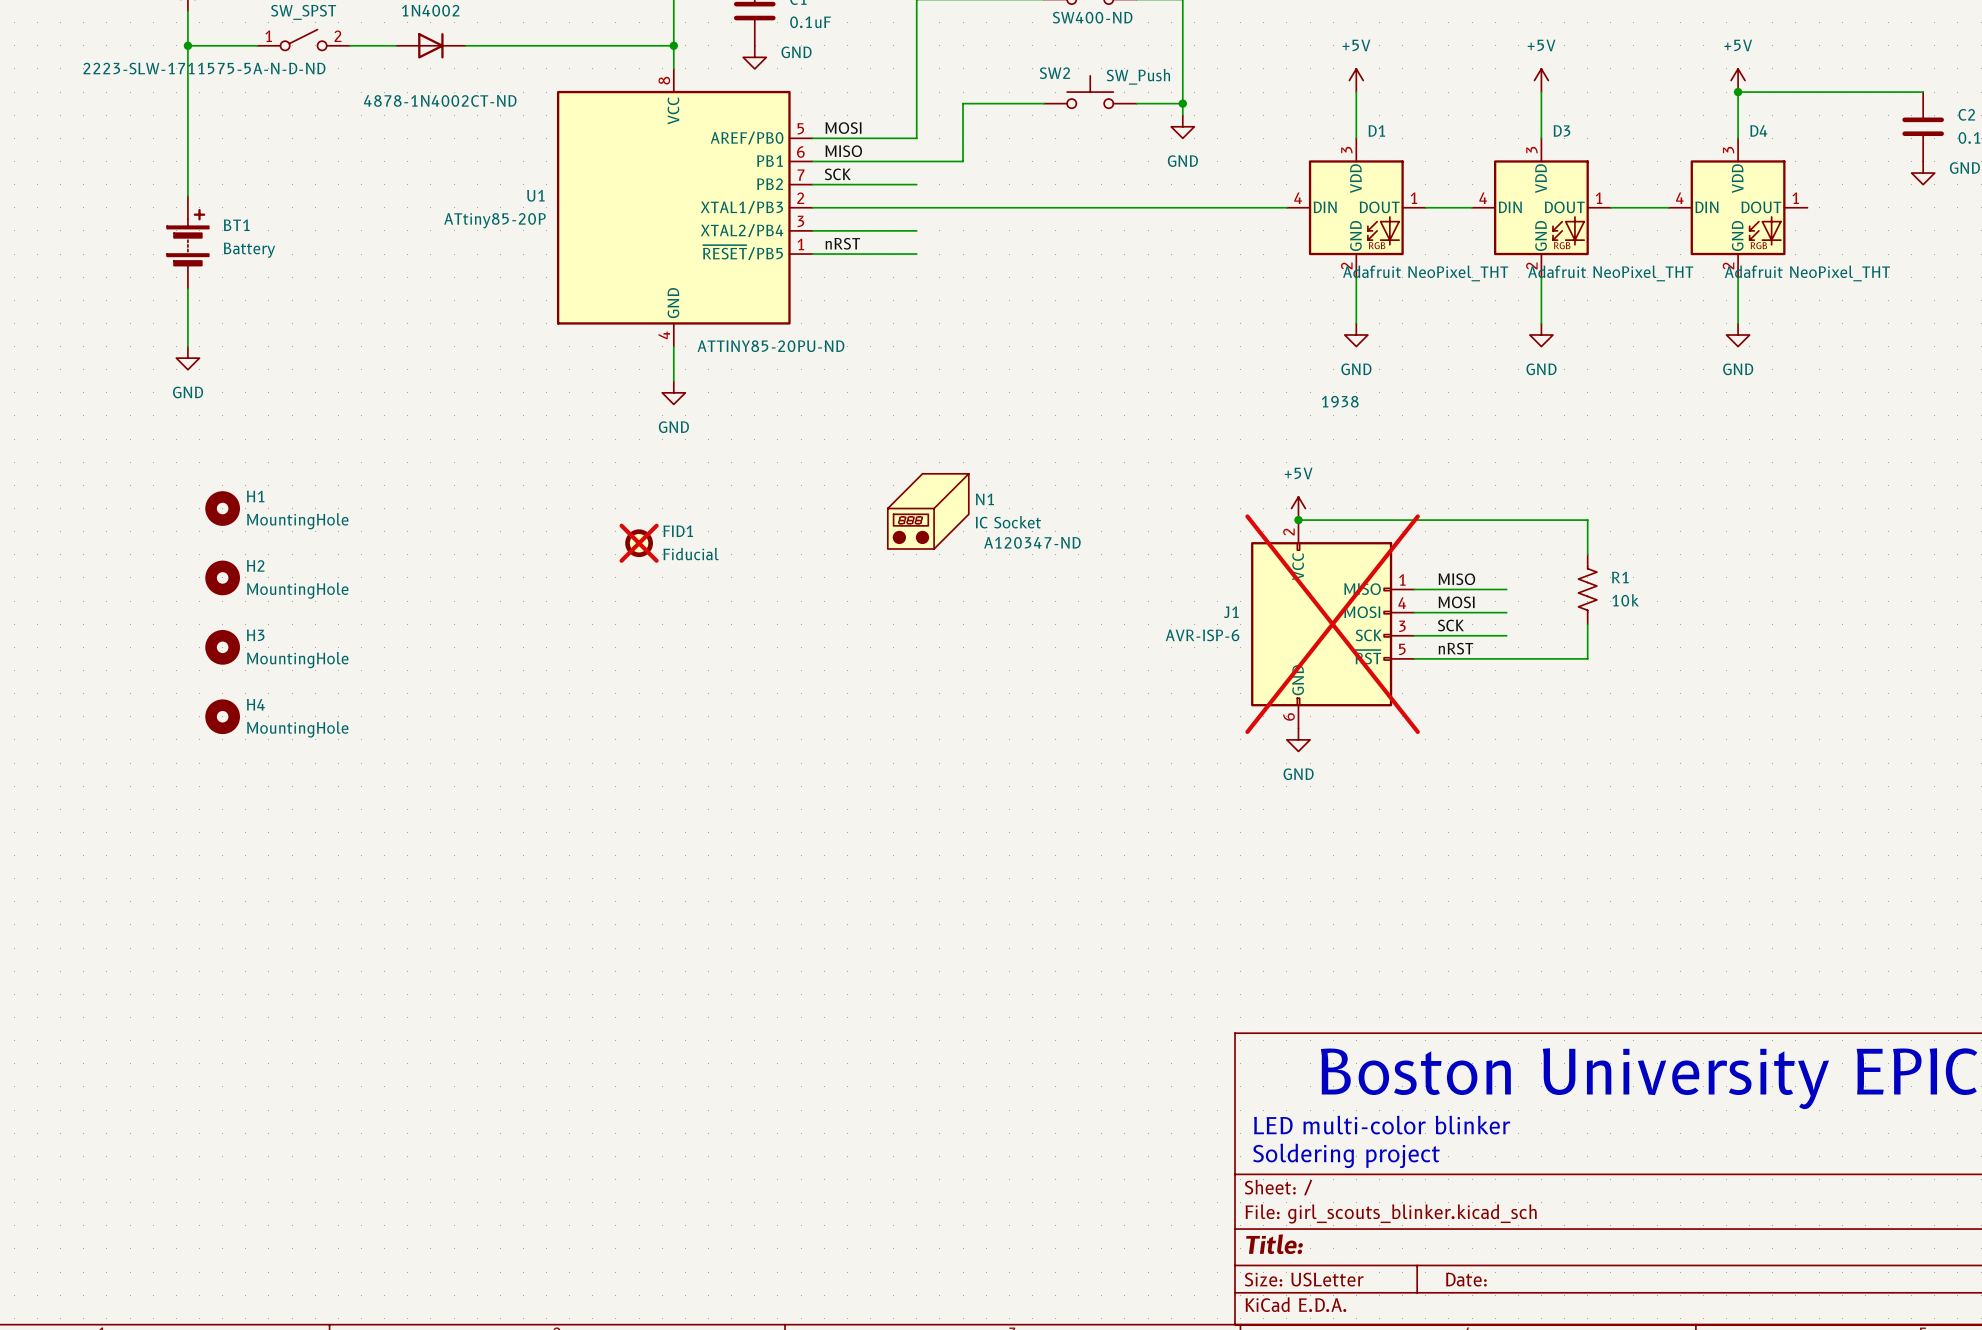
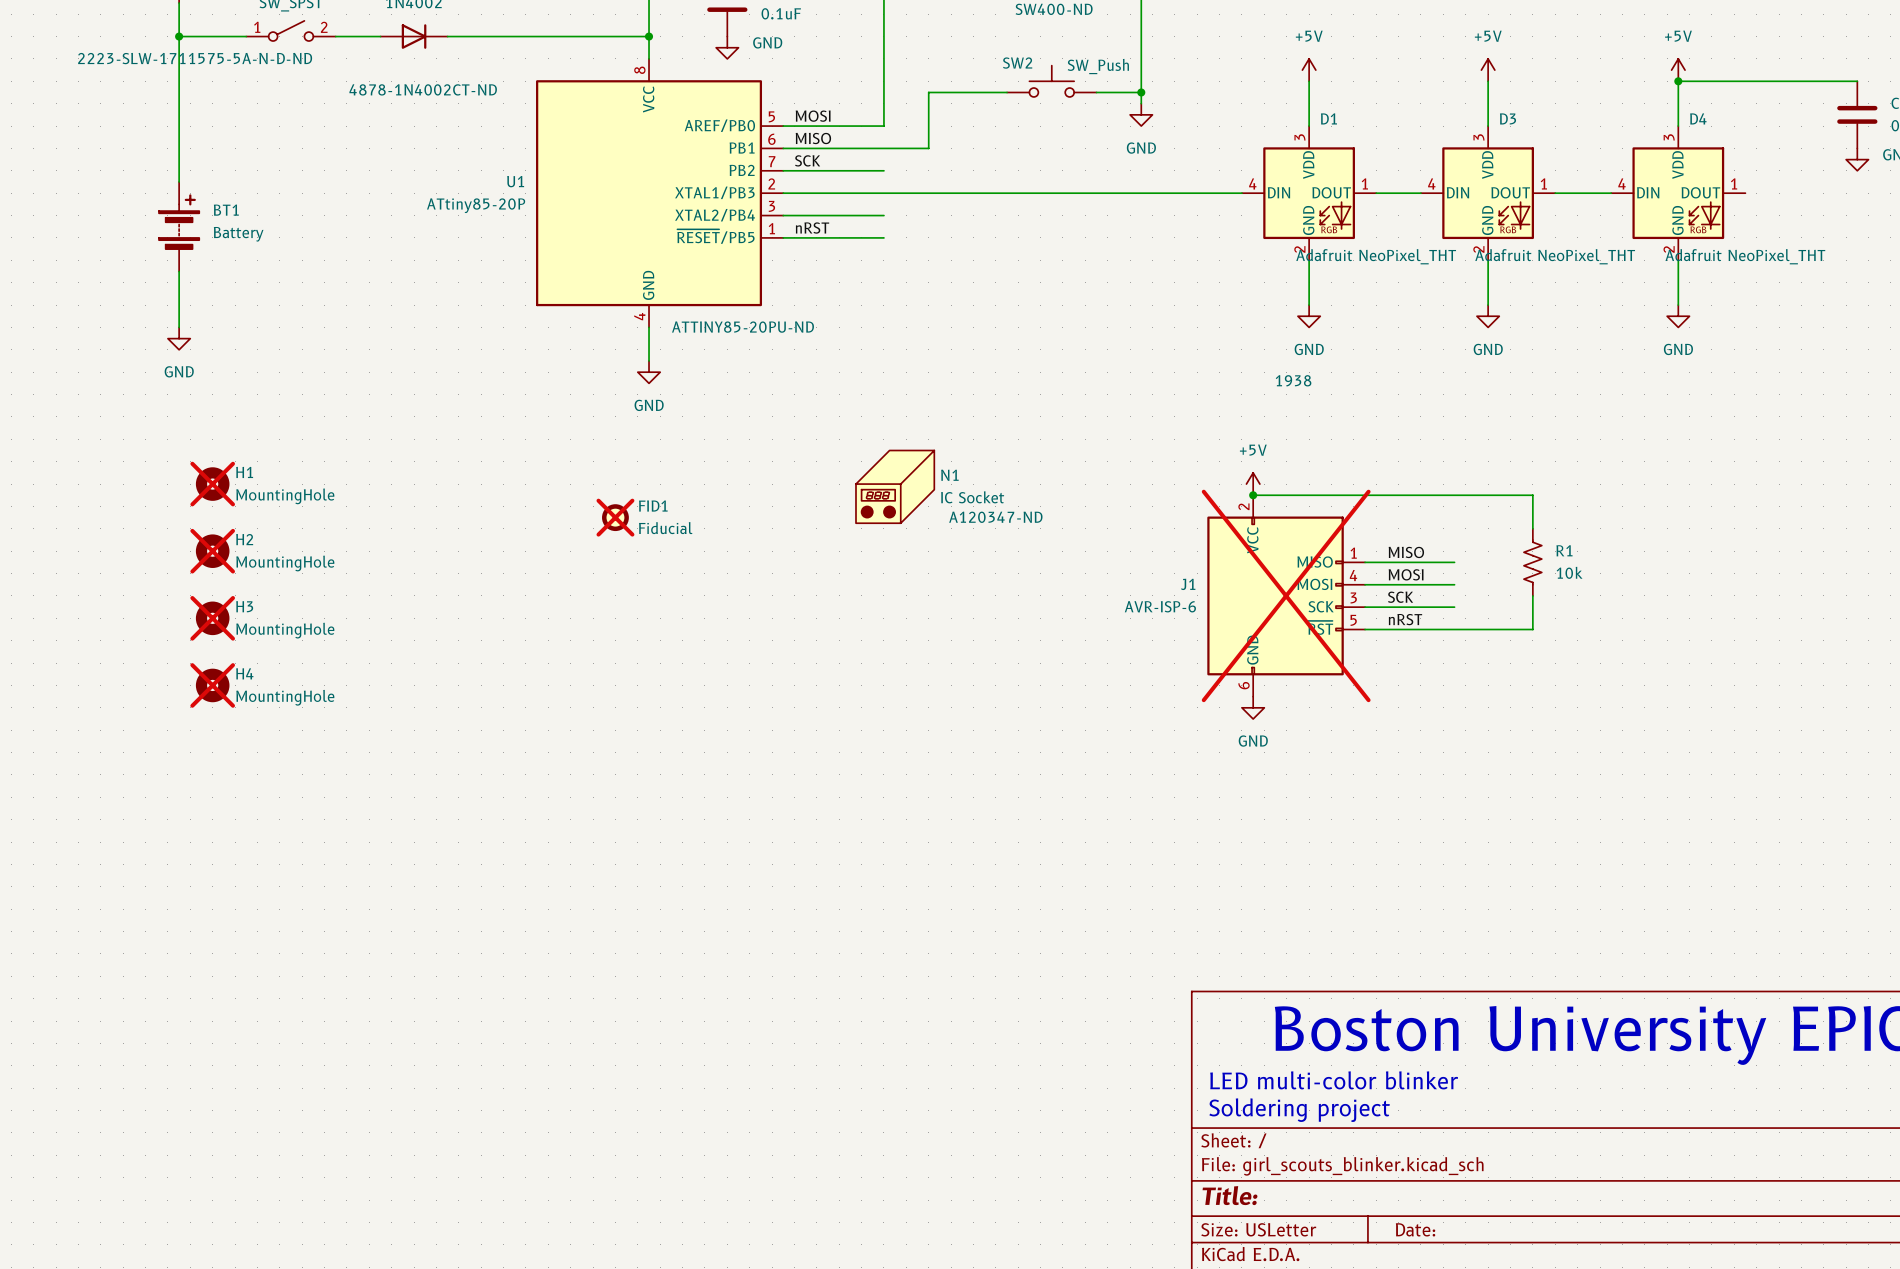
H1 do-not-place cross: none -> (212, 484)
H2 do-not-place cross: none -> (212, 551)
H3 do-not-place cross: none -> (212, 618)
H4 do-not-place cross: none -> (212, 685)

